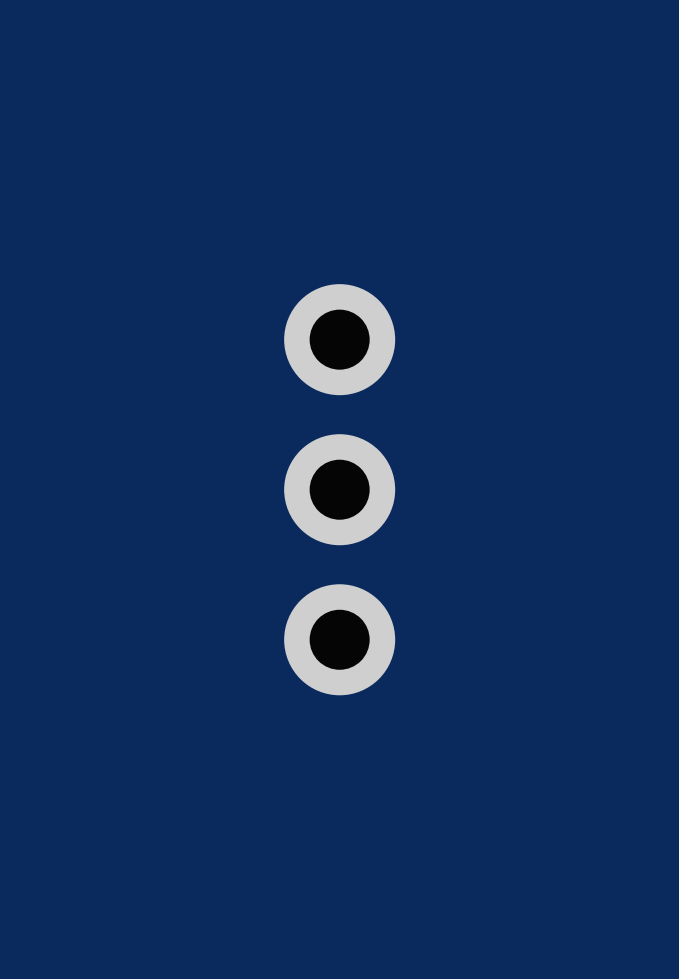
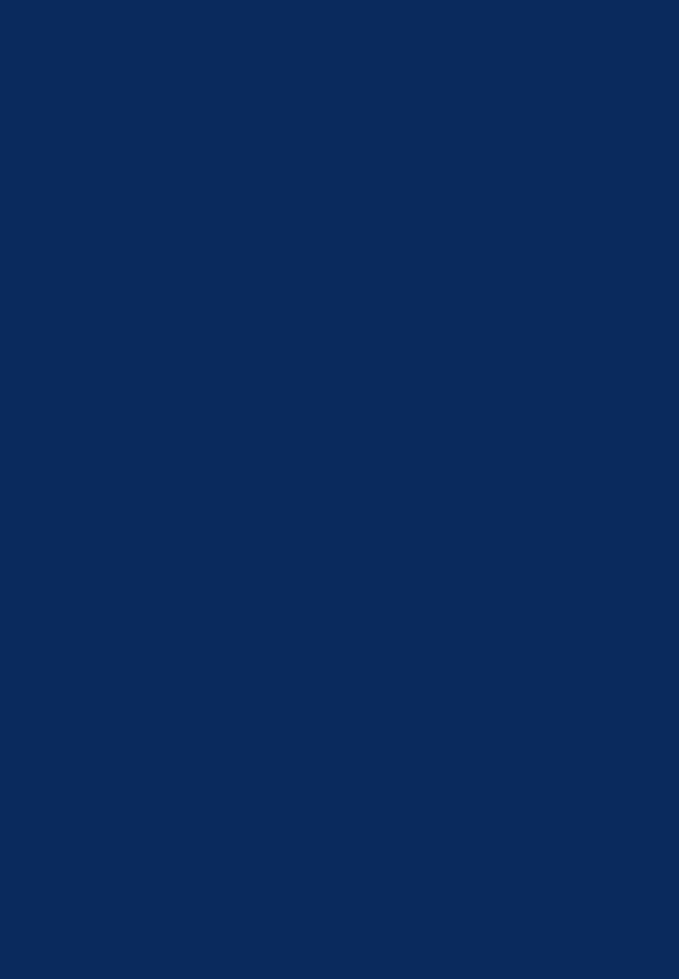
part: (339, 489) -> none

